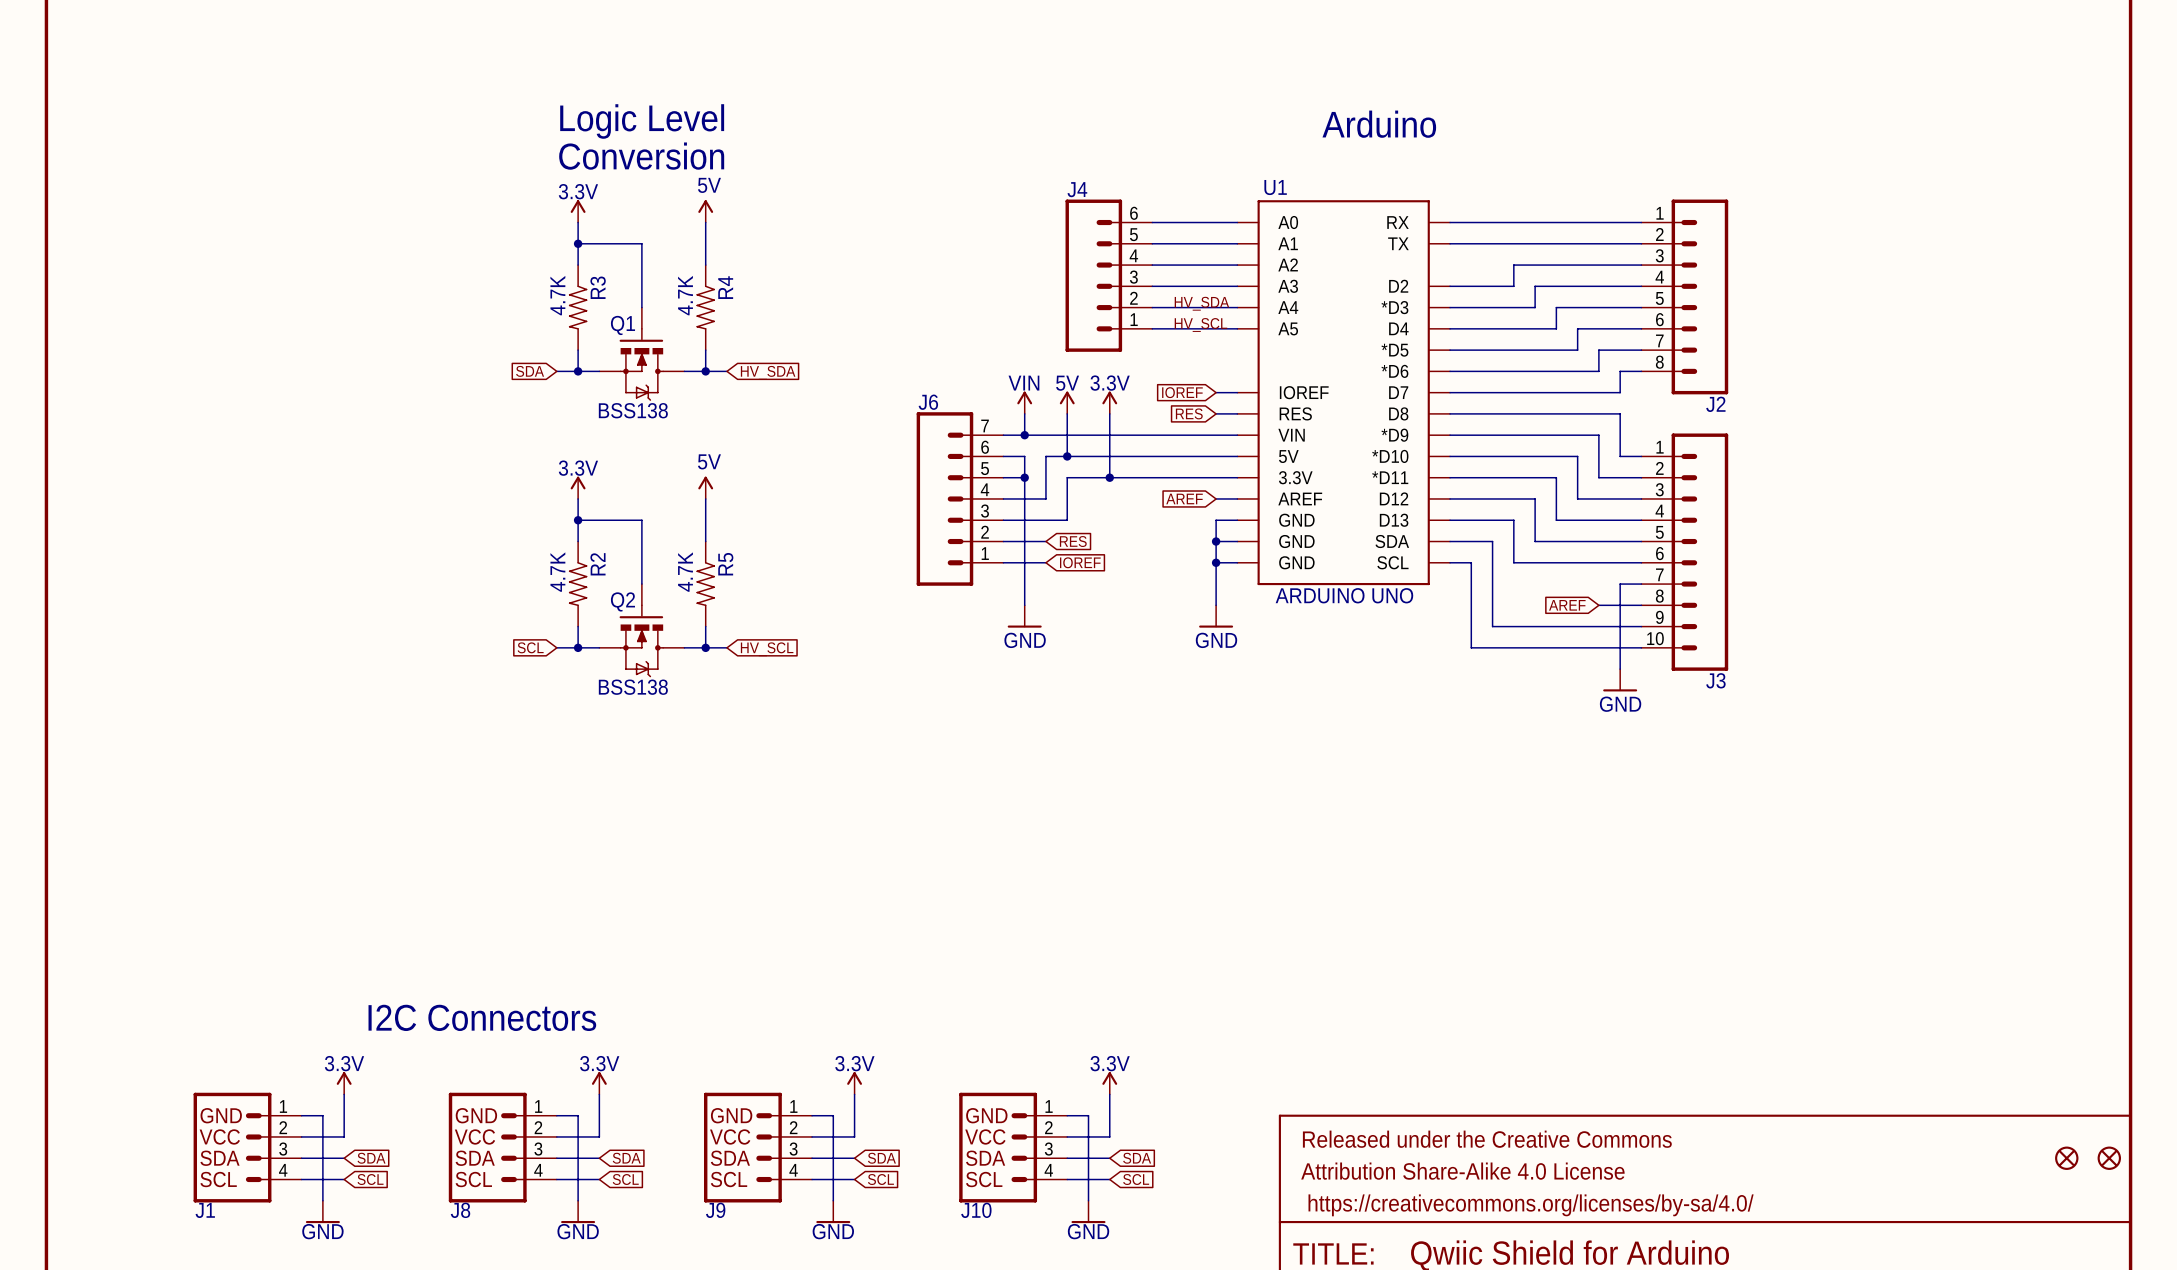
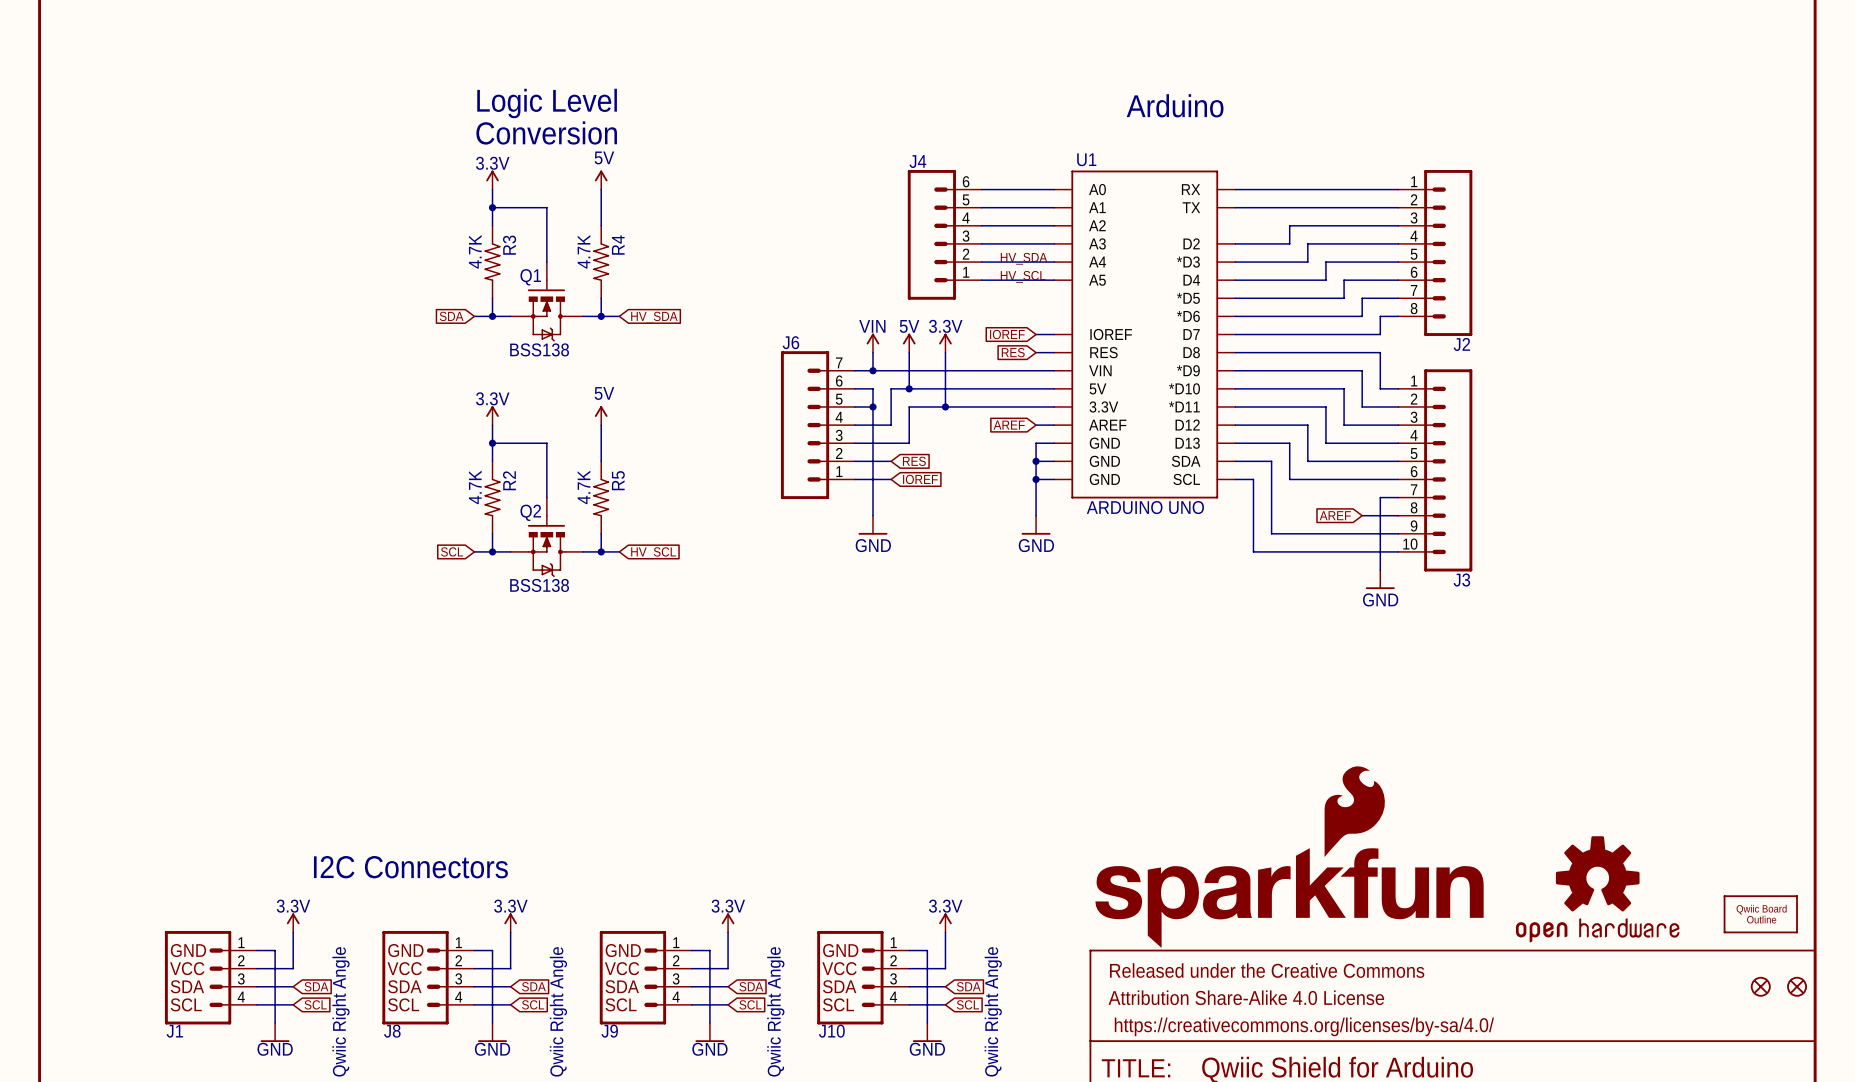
part: none -> (1289, 857)
part: none -> (1597, 889)
part: none -> (1760, 914)
J1 value: none -> Qwiic Right Angle (340, 1011)
J8 value: none -> Qwiic Right Angle (558, 1011)
J9 value: none -> Qwiic Right Angle (775, 1011)
J10 value: none -> Qwiic Right Angle (993, 1011)

